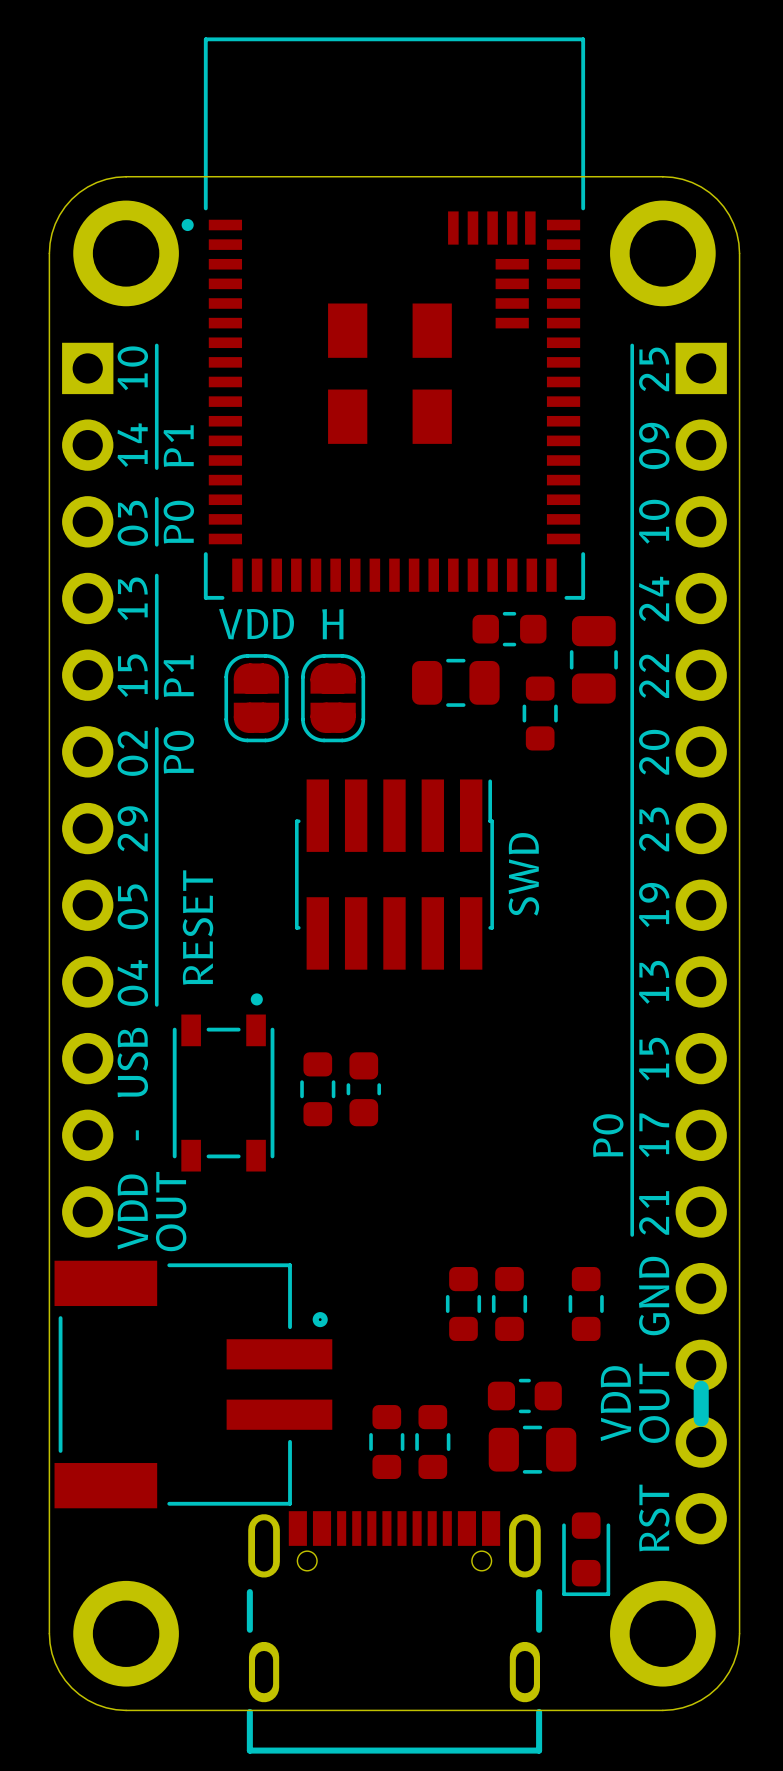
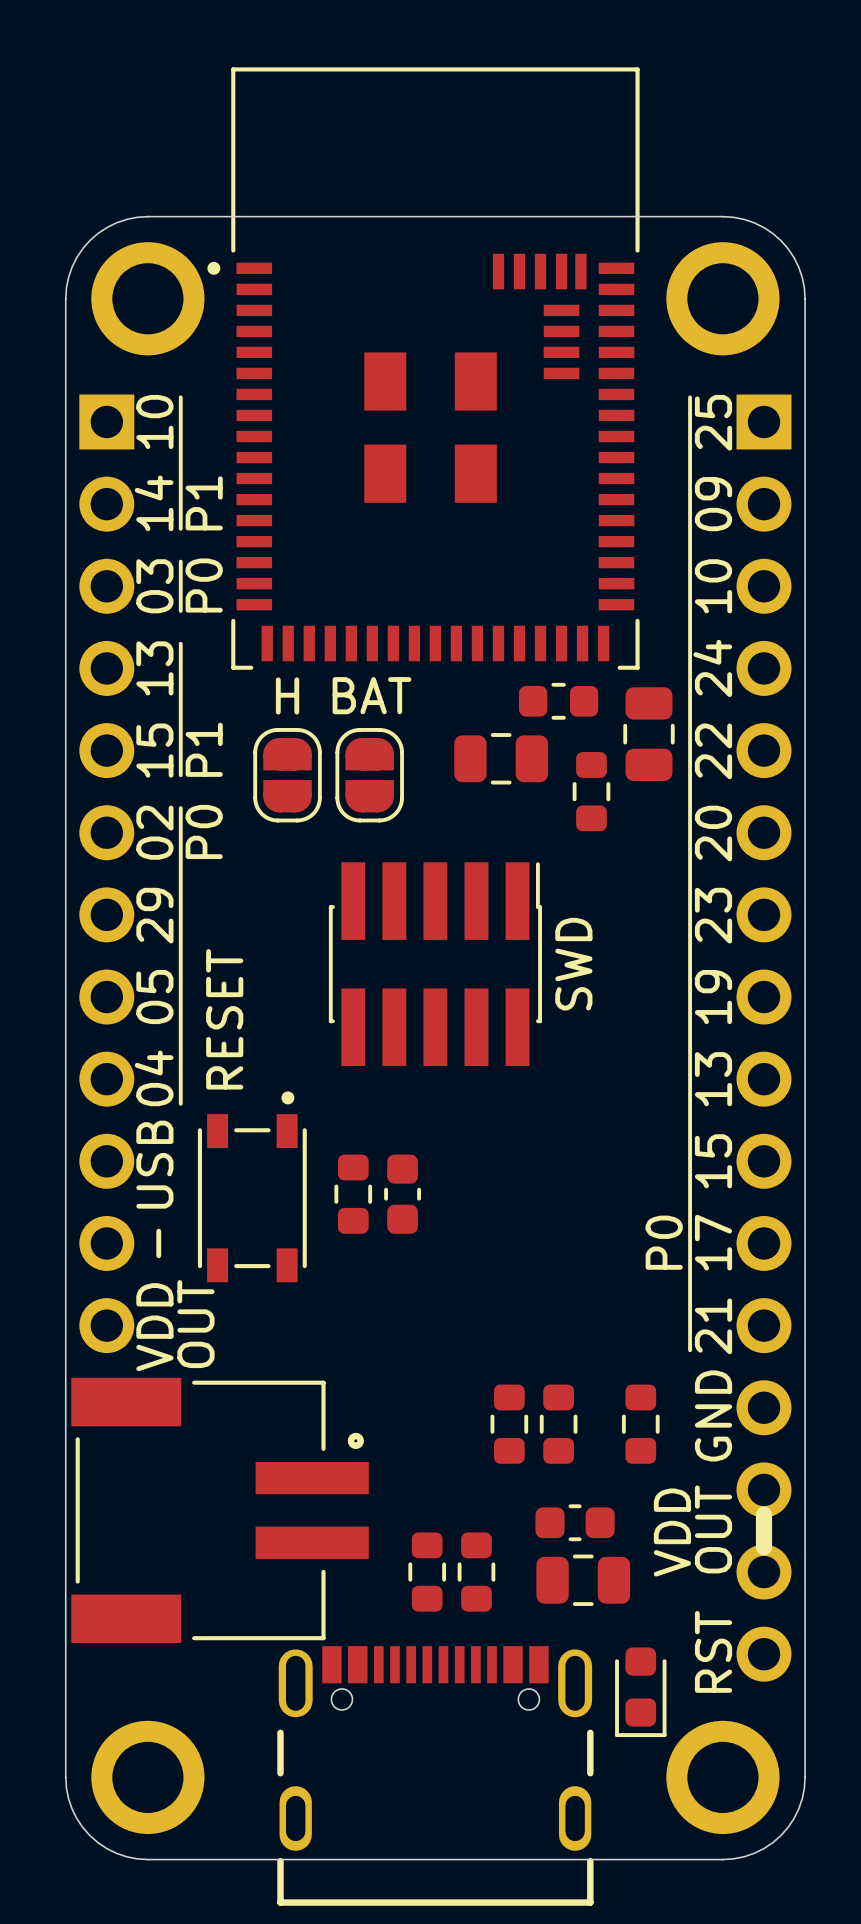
text: VDD (256, 624) -> H (287, 695)
text: H (332, 624) -> BAT (372, 695)

